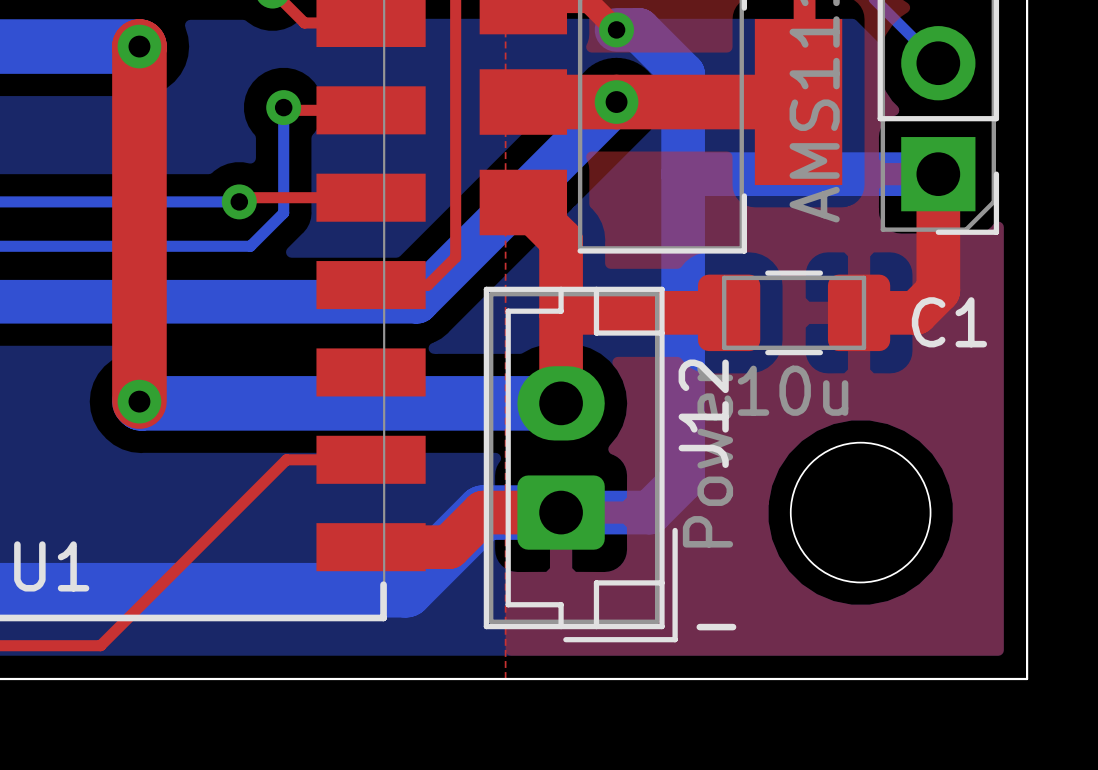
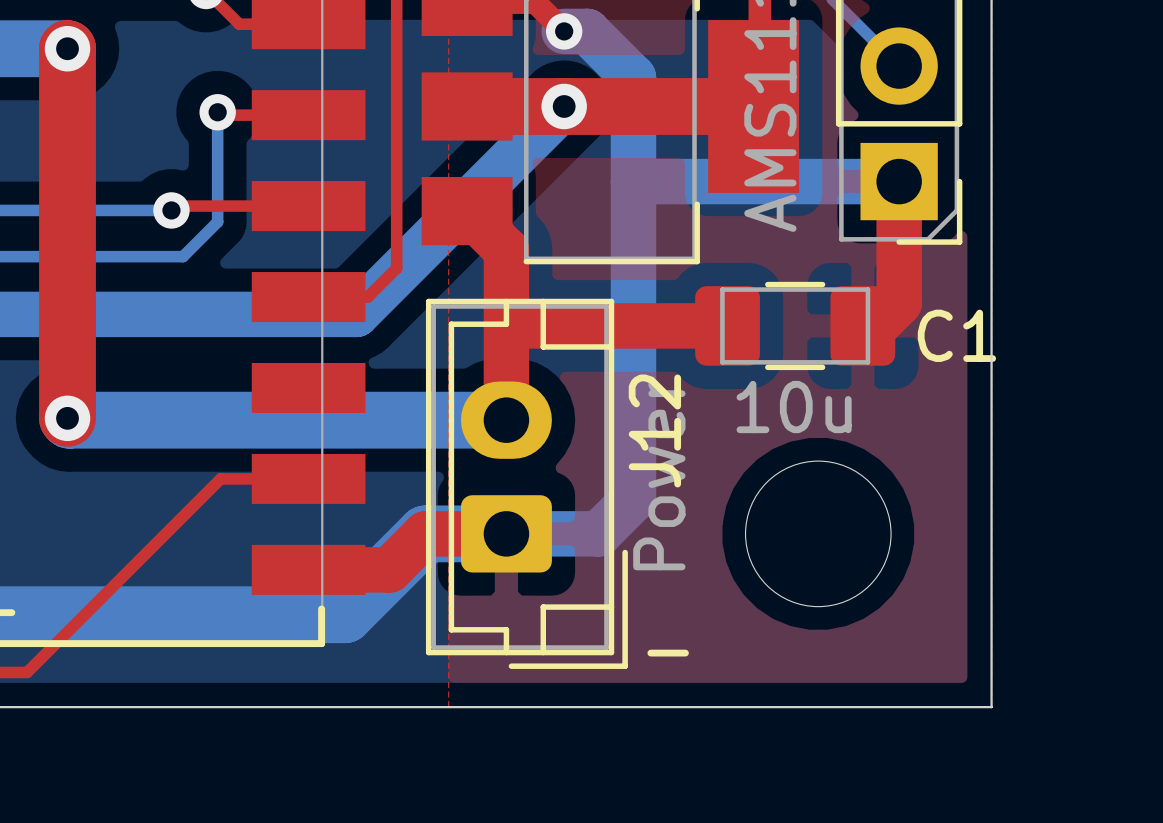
C1 position: (794, 312) -> (795, 325)

